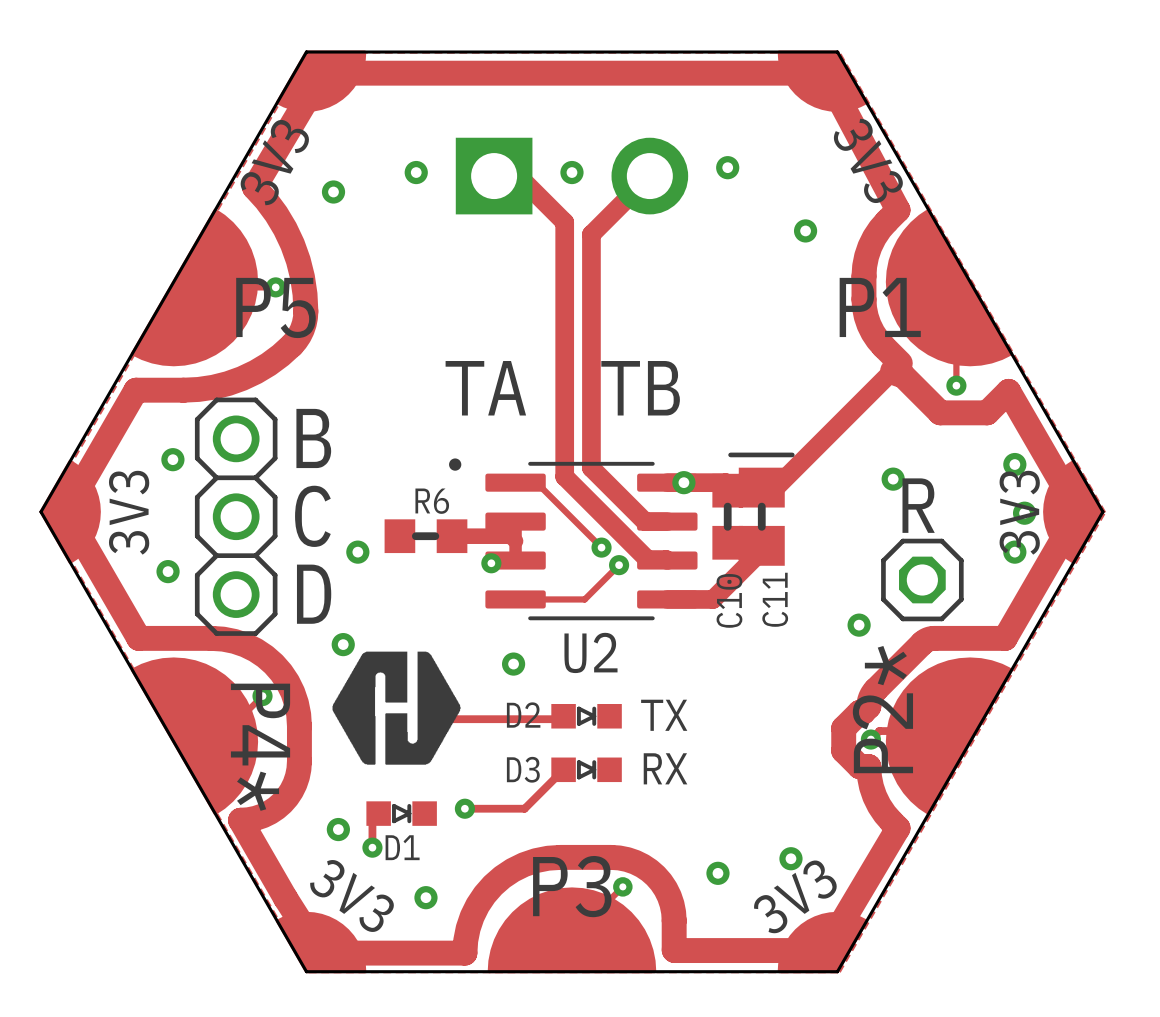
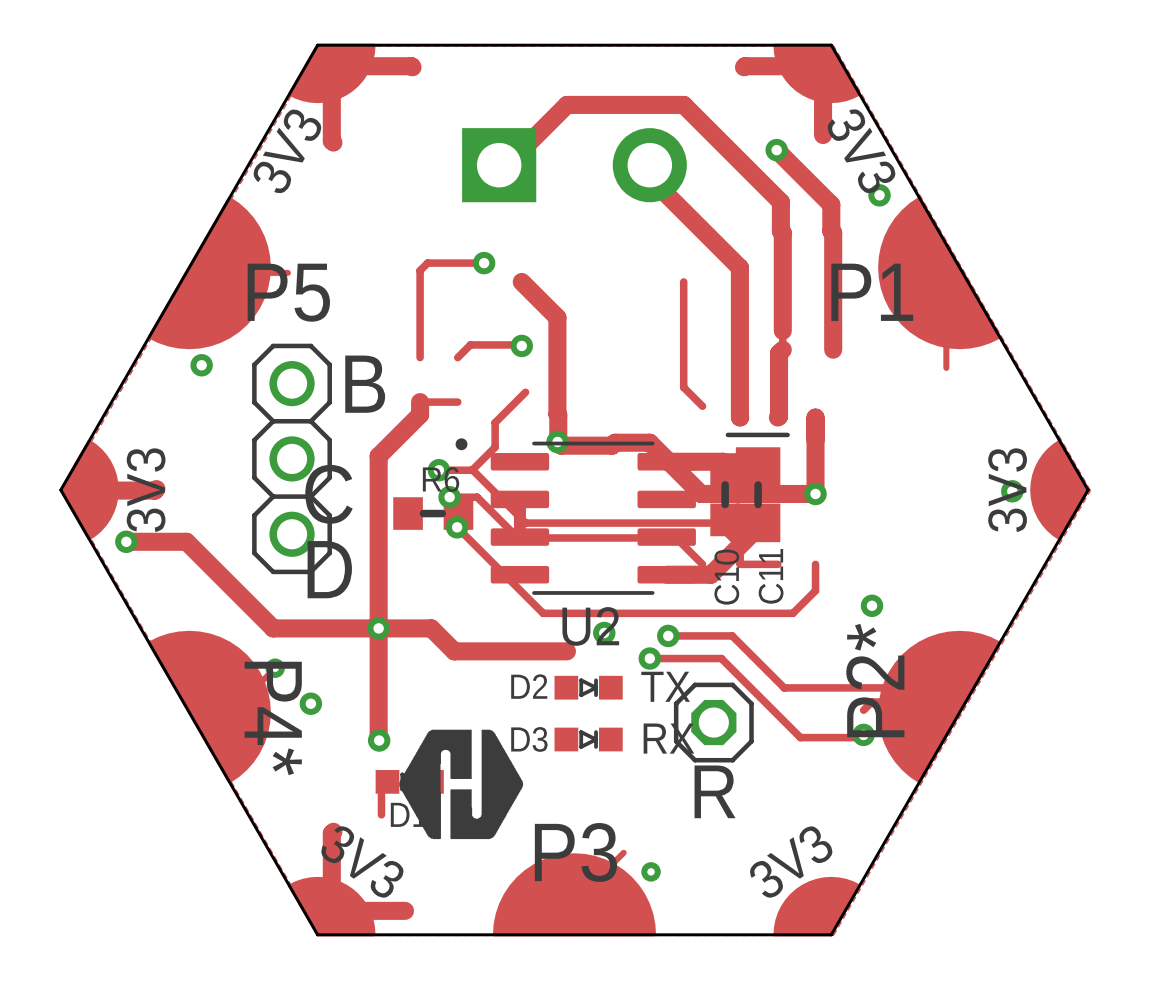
track: none -> (412, 67) (331, 66) (331, 140) (333, 142)
track: none -> (743, 67) (821, 66) (823, 135)
track: none -> (776, 150) (831, 204) (831, 231) (833, 232) (833, 349)
via: none -> (776, 150)
via: (727, 167) -> none
via: (416, 172) -> none
via: (571, 172) -> none
track: (494, 176) (518, 176) (564, 222) (564, 476) (647, 559) (667, 560) -> none
track: none -> (506, 165) (566, 104) (683, 104) (780, 202) (782, 349) (779, 353) (777, 417)
track: (649, 176) (591, 234) (591, 468) (644, 521) (667, 521) -> none
track: none -> (656, 165) (647, 174) (739, 267) (739, 417)
via: (333, 192) -> none
via: none -> (879, 195)
via: (805, 230) -> none
track: none -> (484, 263) (427, 263) (420, 270) (420, 357)
via: none -> (484, 263)
via: (275, 287) -> none
track: none -> (521, 281) (557, 317) (558, 442)
track: none -> (683, 281) (683, 387) (702, 406)
track: none -> (521, 345) (470, 344) (457, 357)
via: none -> (521, 345)
track: (900, 363) (872, 332) (866, 316) (863, 299) (864, 266) (869, 246) (880, 229) (898, 210) (825, 73) (318, 73) (318, 79) (254, 187) (276, 214) (292, 244) (298, 260) (302, 277) (305, 311) (304, 323) (299, 335) (291, 345) (268, 364) (227, 383) (198, 389) (136, 390) (65, 511) (138, 638) (211, 638) (234, 641) (265, 656) (287, 682) (298, 714) (299, 761) (294, 783) (287, 797) (276, 808) (255, 818) (240, 820) (285, 898) (321, 953) (464, 953) (468, 928) (472, 916) (484, 894) (492, 885) (502, 877) (524, 864) (535, 860) (560, 857) (619, 857) (635, 862) (649, 870) (665, 889) (672, 904) (674, 950) (825, 950) (898, 828) (884, 814) (874, 796) (868, 766) (859, 766) (843, 750) (843, 728) (859, 712) (863, 712) (868, 706) (873, 692) (925, 640) (934, 638) (1005, 638) (1078, 511) (1008, 391) (987, 412) (940, 412) (902, 374) (892, 370) (775, 487) (730, 487) (727, 490) (719, 482) -> none
via: none -> (201, 365)
via: (956, 385) -> none
text: TA (485, 388) -> none
text: TB (640, 388) -> none
track: none -> (525, 392) (495, 422) (495, 447) (472, 470)
track: none -> (457, 402) (420, 402) (420, 414) (378, 456) (379, 740)
track: none -> (815, 417) (815, 493) (701, 493) (649, 442) (615, 442) (612, 445) (561, 445) (558, 442)
text position: B (313, 438) -> B (365, 384)
via: (172, 459) -> none
via: none -> (557, 441)
via: (1014, 464) -> none
via: (893, 479) -> none
track: (515, 482) (536, 482) (601, 547) -> none
via: (683, 482) -> none
track: none -> (438, 470) (472, 470)
via: none -> (438, 470)
track: none -> (472, 470) (525, 523) (717, 523) (740, 546) (740, 564) (777, 564)
R name position: R (918, 505) -> R (715, 791)
track: none -> (156, 489) (86, 490)
via: none -> (815, 493)
part position: (236, 516) -> (292, 458)
track: none -> (449, 497) (477, 497) (517, 537) (676, 537) (702, 564)
via: none -> (449, 497)
track: (452, 536) (510, 536) (515, 541) -> none
via: (601, 547) -> none
track: none -> (457, 527) (543, 613) (792, 613) (815, 590) (815, 564)
via: none -> (457, 527)
via: (357, 552) -> none
via: (1014, 552) -> none
via: (491, 563) -> none
track: none -> (126, 541) (186, 541) (273, 628) (431, 628) (454, 651) (566, 651)
track: (619, 565) (584, 599) (515, 599) -> none
via: (619, 565) -> none
via position: (168, 571) -> (126, 541)
R position: (922, 579) -> (713, 722)
via position: (859, 625) -> (872, 605)
via position: (343, 644) -> (378, 628)
via: none -> (604, 632)
track: none -> (668, 635) (732, 635) (784, 687) (929, 687) (944, 702) (944, 698)
via: none -> (668, 635)
via: (513, 664) -> none
track: none -> (649, 658) (721, 658) (800, 737) (860, 737) (863, 734)
via: none -> (649, 658)
drawing position: (396, 708) -> (461, 784)
track: (563, 716) (560, 719) (437, 719) -> none
via: none -> (310, 703)
via: (870, 739) -> none
via: none -> (863, 734)
track: (563, 769) (524, 808) (464, 808) -> none
via: none -> (379, 740)
via: (464, 808) -> none
via: (338, 829) -> none
via: (372, 847) -> none
via: (790, 858) -> none
track: none -> (333, 831) (331, 833) (331, 914) (335, 910) (405, 910)
via: (717, 873) -> none
via: (622, 886) -> none
via: (425, 897) -> none
via: none -> (651, 871)

